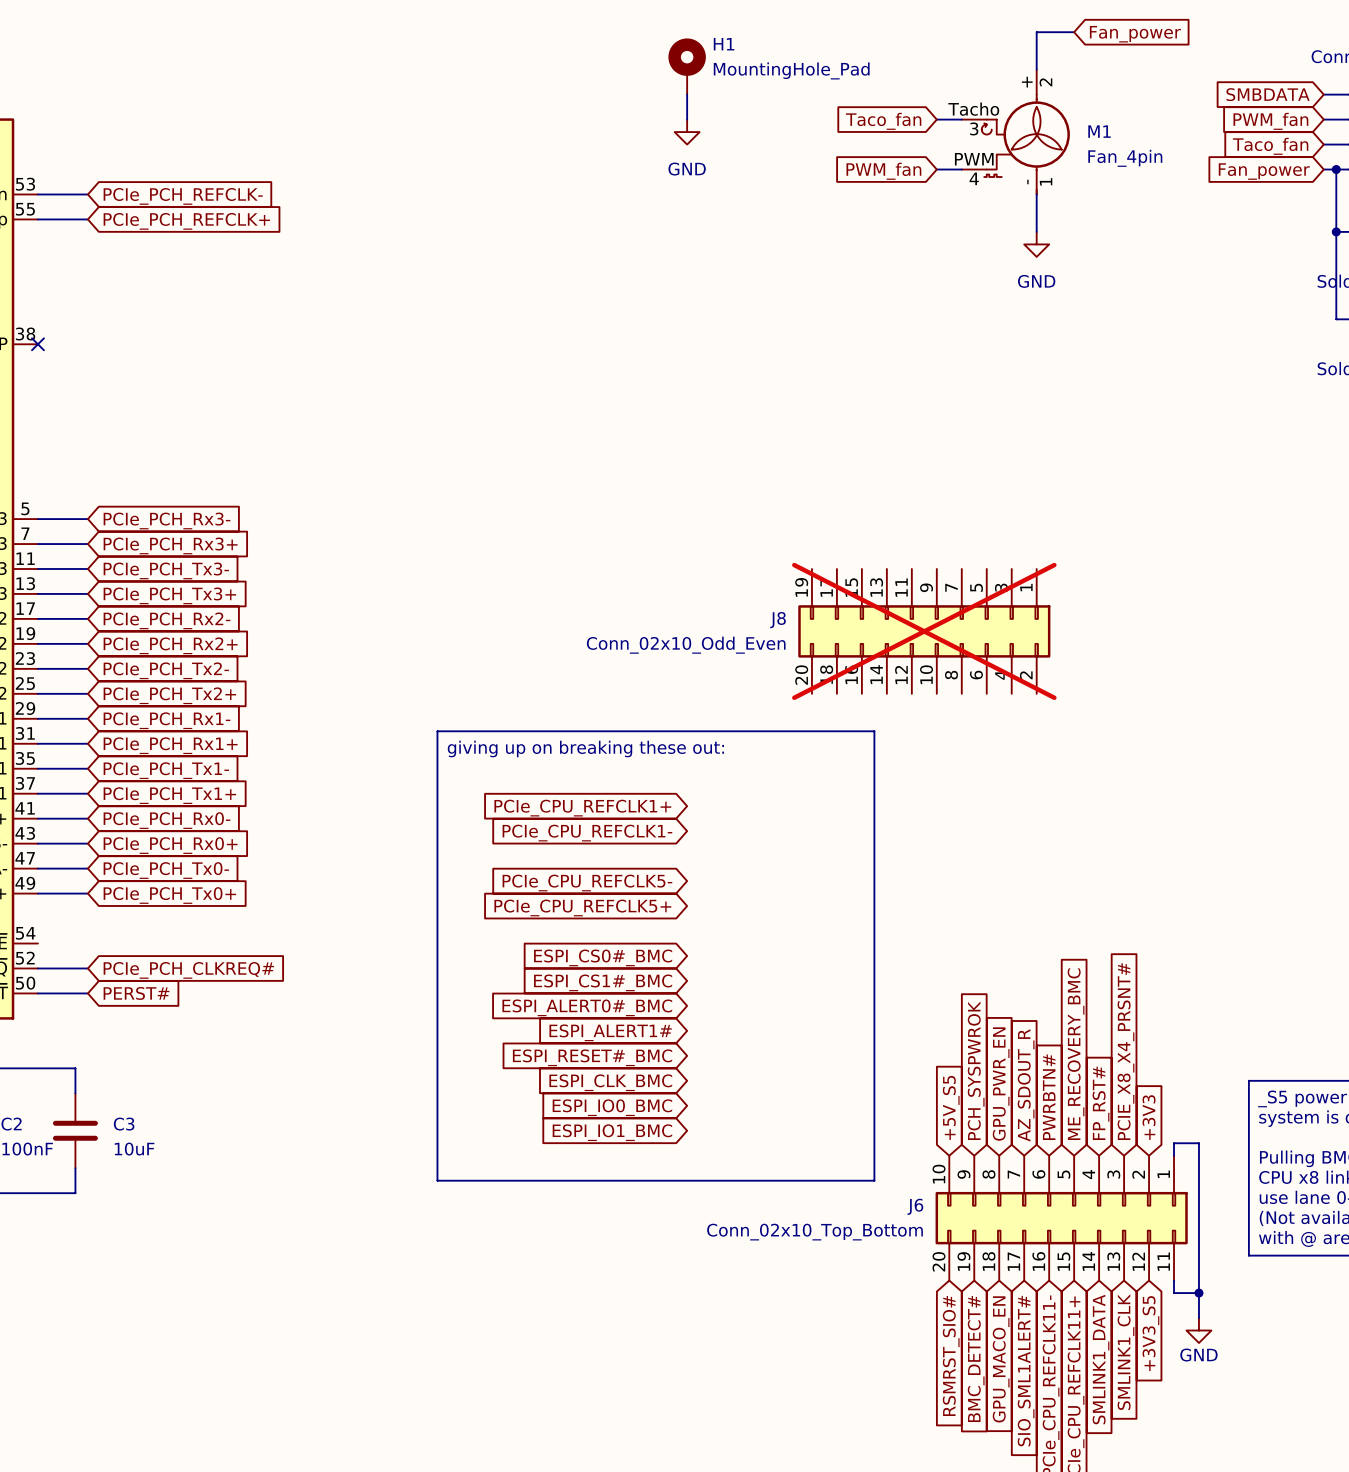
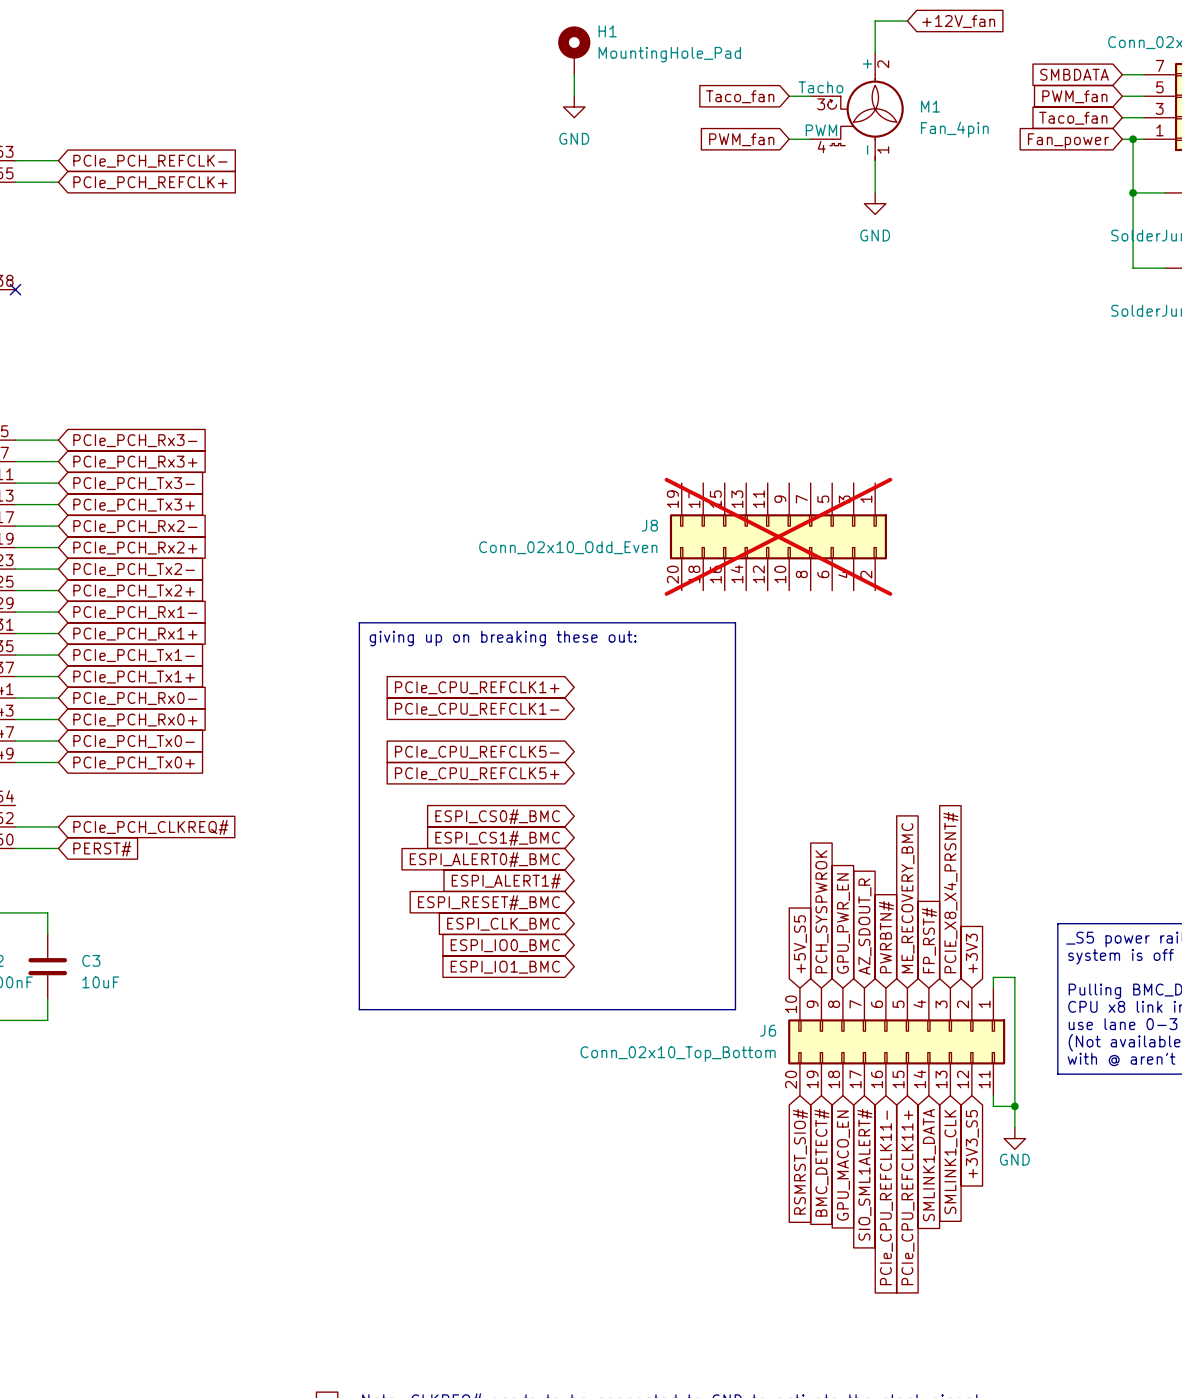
global label: Fan_power (1135, 34) -> +12V_fan (958, 21)

